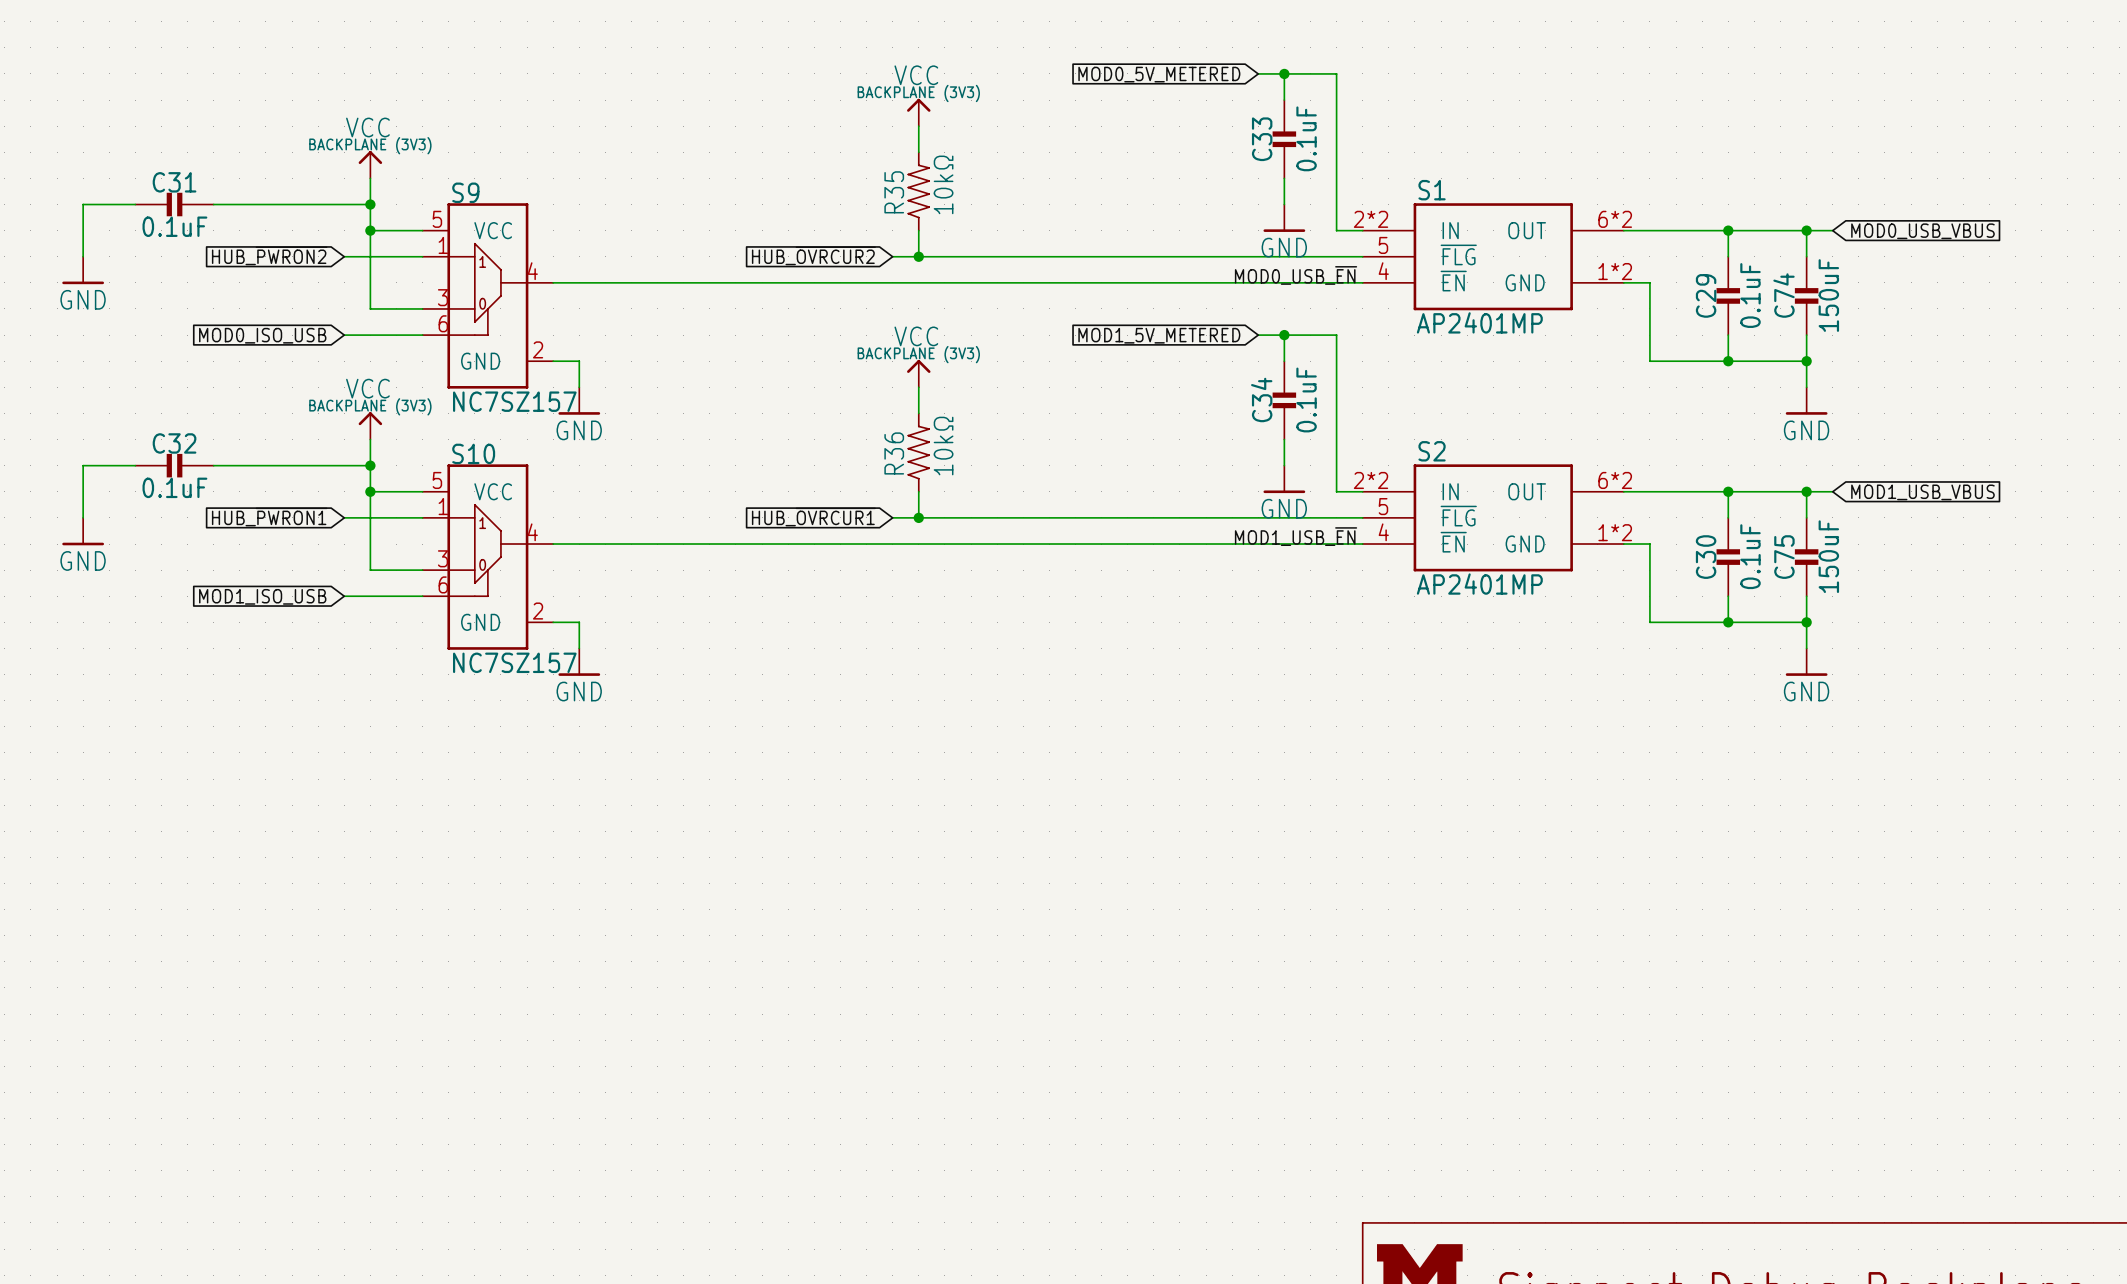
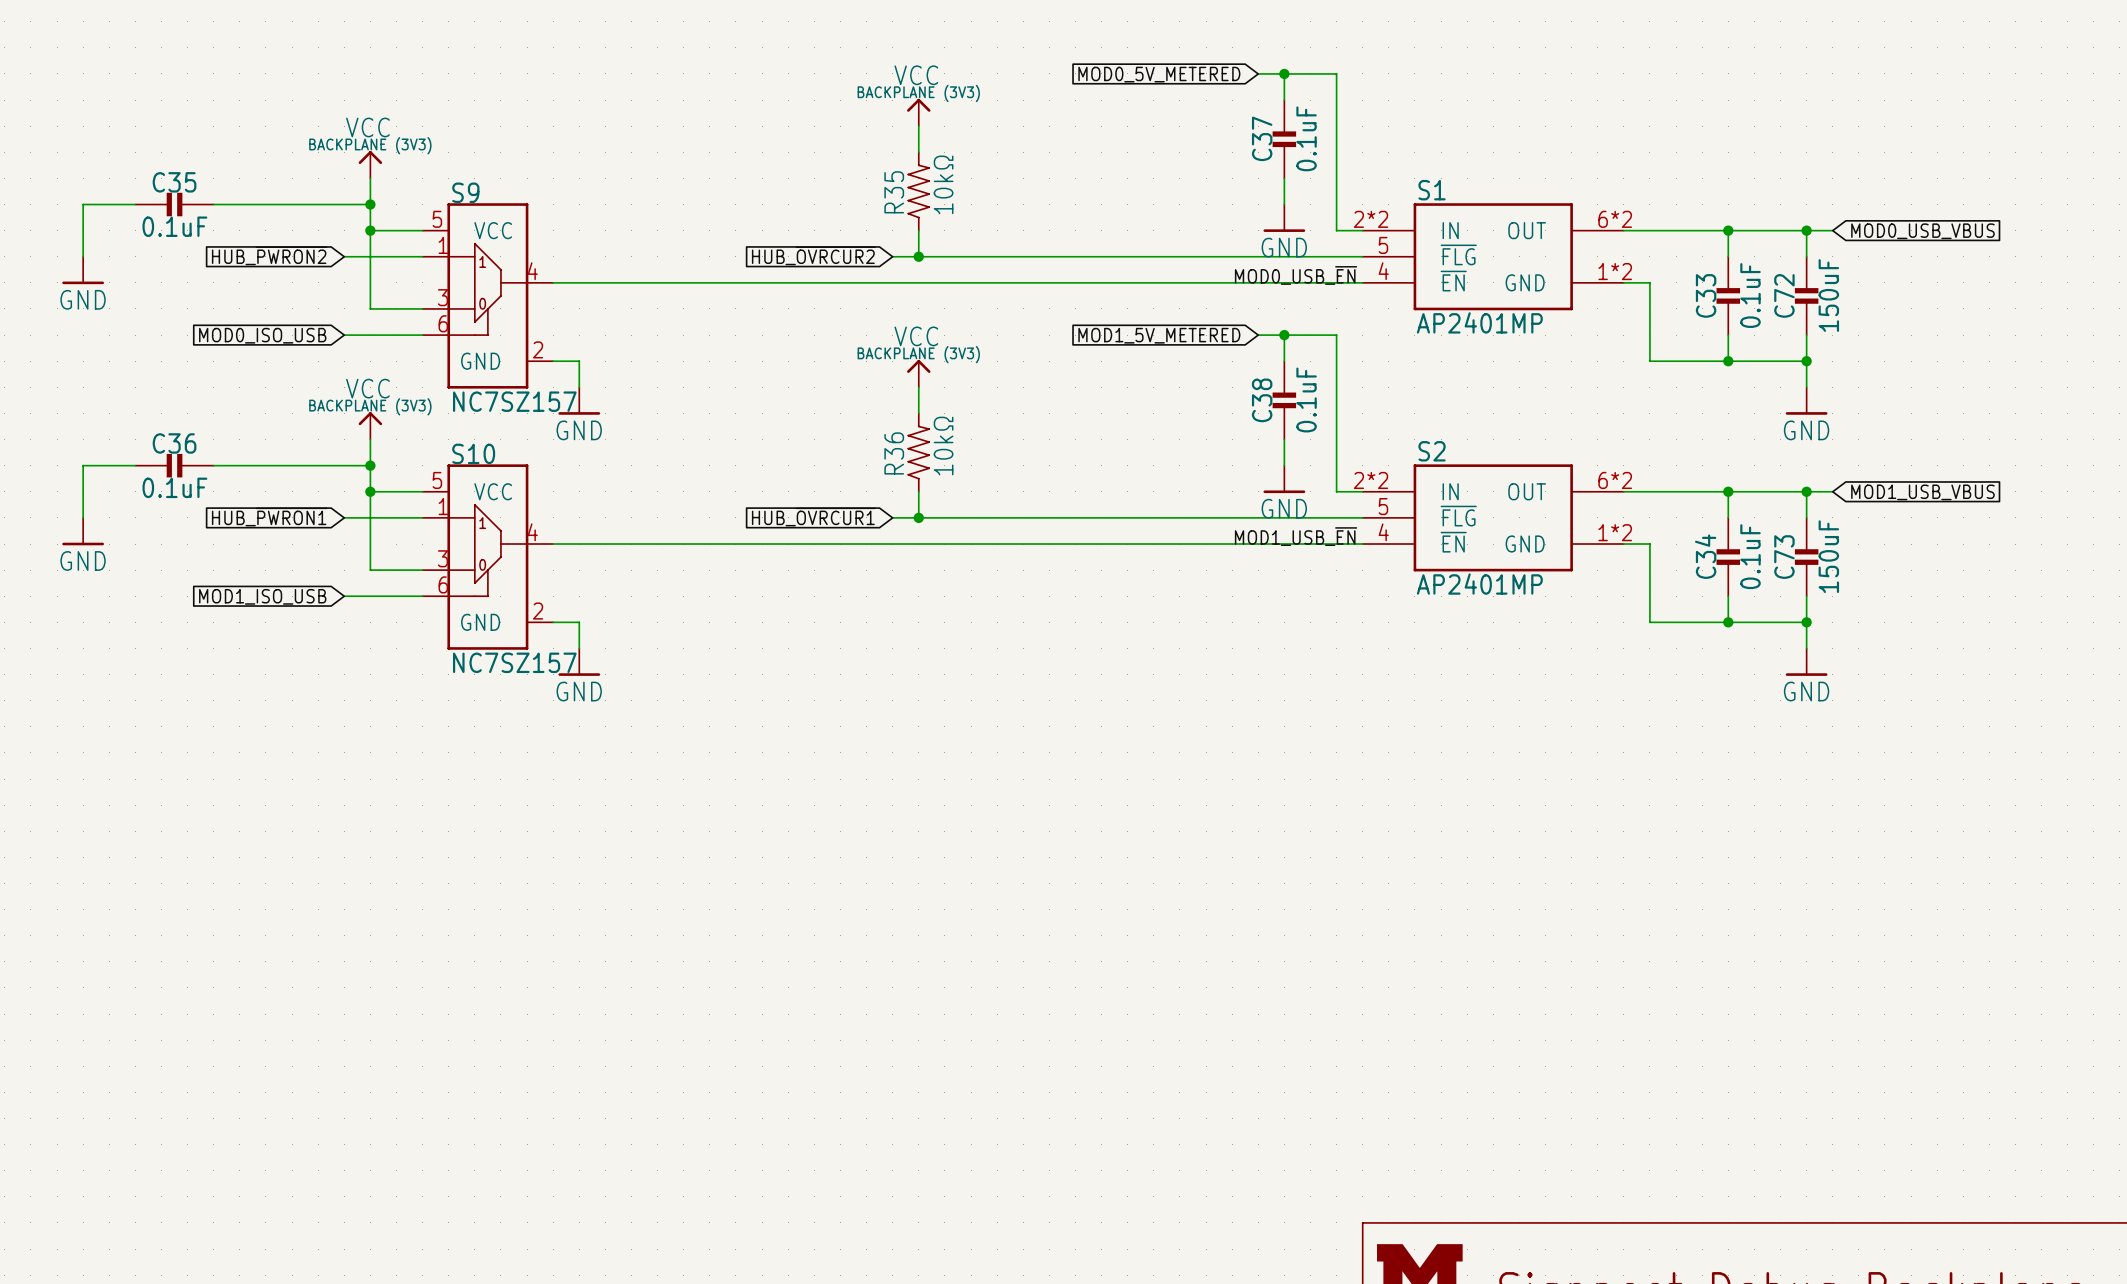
C33 name: C33 (1262, 139) -> C37 (1262, 138)
C31 name: C31 (174, 182) -> C35 (174, 182)
C29 name: C29 (1706, 295) -> C33 (1706, 295)
C74 name: C74 (1784, 295) -> C72 (1784, 295)
C34 name: C34 (1261, 399) -> C38 (1262, 400)
C32 name: C32 (174, 443) -> C36 (174, 443)
C30 name: C30 (1706, 557) -> C34 (1705, 556)
C75 name: C75 (1784, 557) -> C73 (1784, 557)

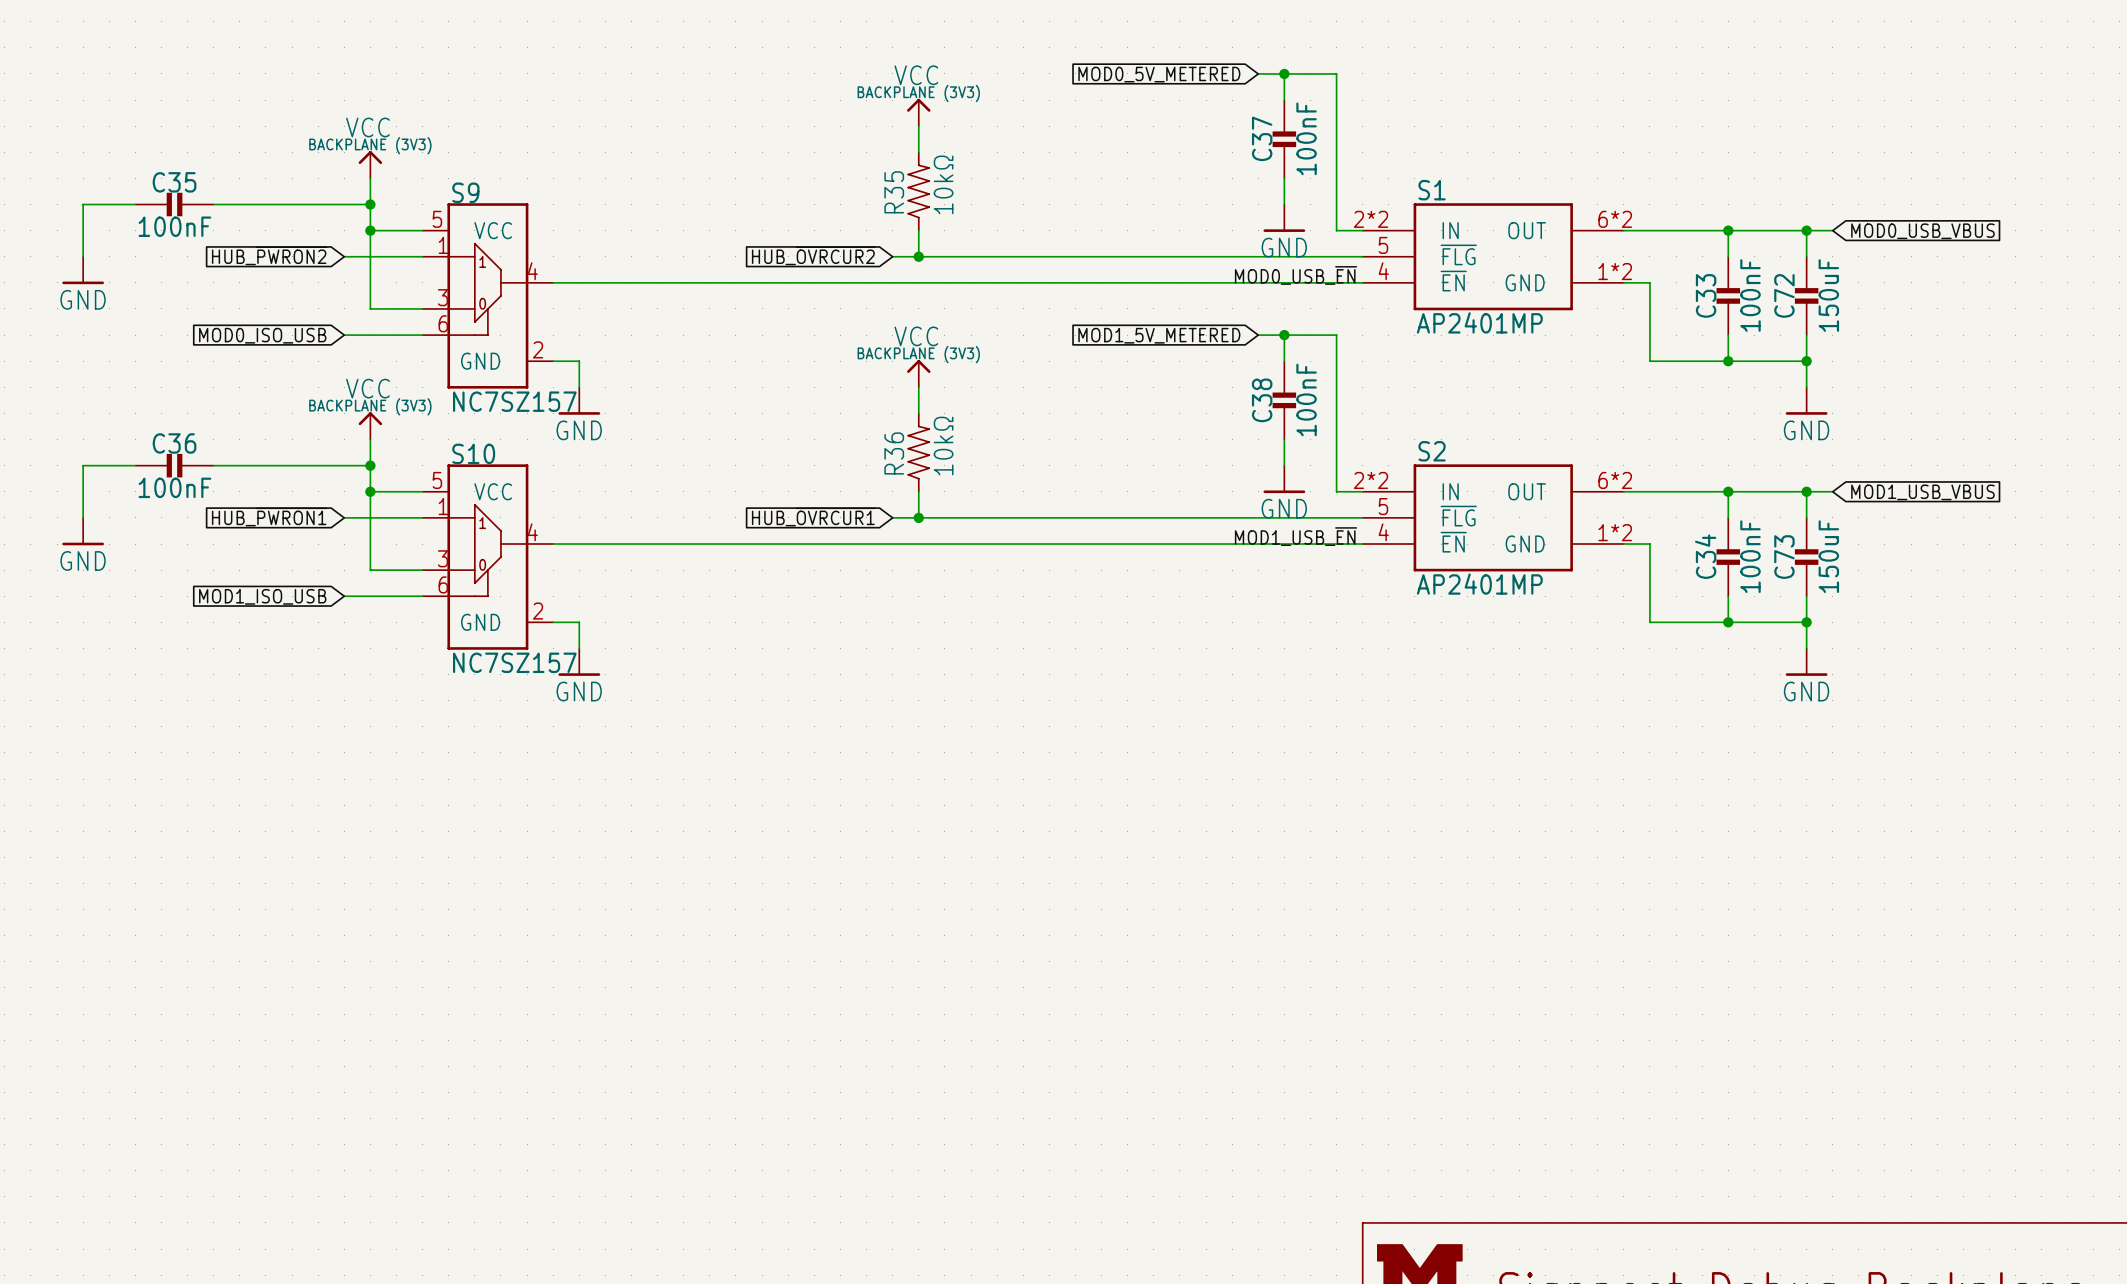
C37 value: 0.1uF (1306, 138) -> 100nF (1306, 138)
C35 value: 0.1uF (174, 226) -> 100nF (174, 226)
C33 value: 0.1uF (1750, 295) -> 100nF (1750, 295)
C38 value: 0.1uF (1306, 399) -> 100nF (1306, 399)
C36 value: 0.1uF (174, 487) -> 100nF (174, 487)
C34 value: 0.1uF (1750, 556) -> 100nF (1750, 556)

